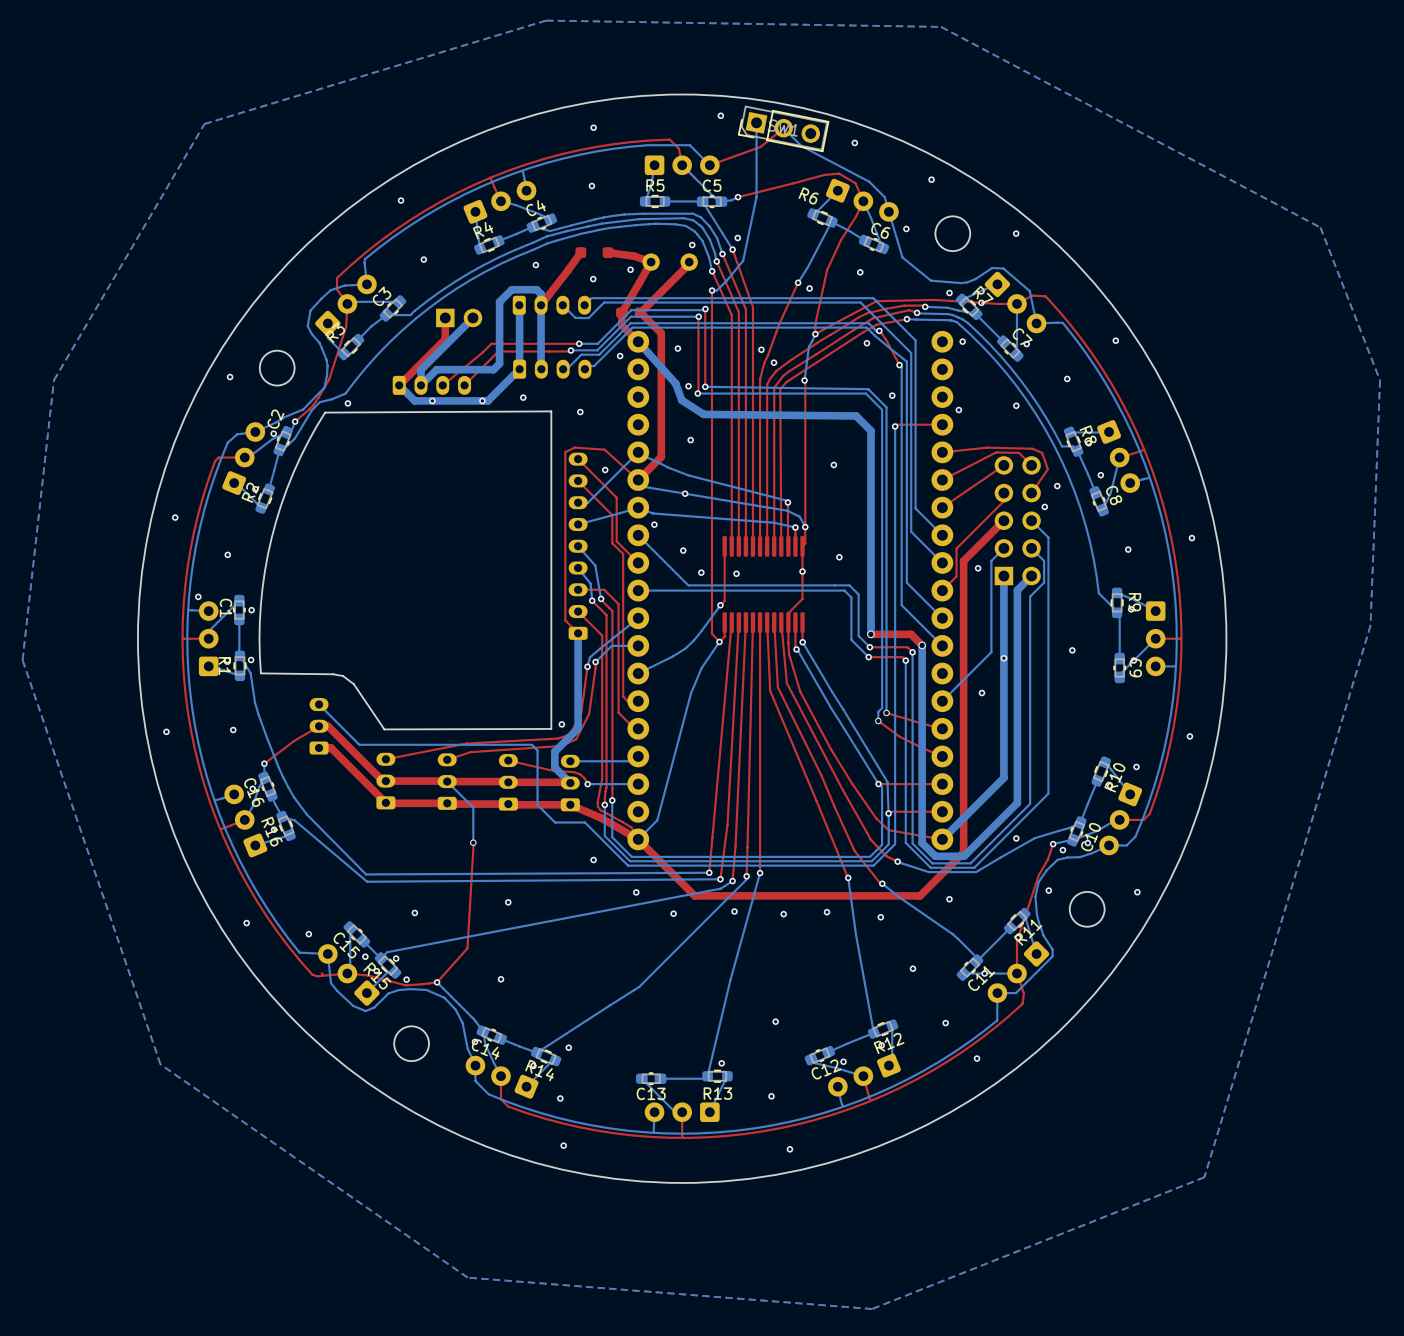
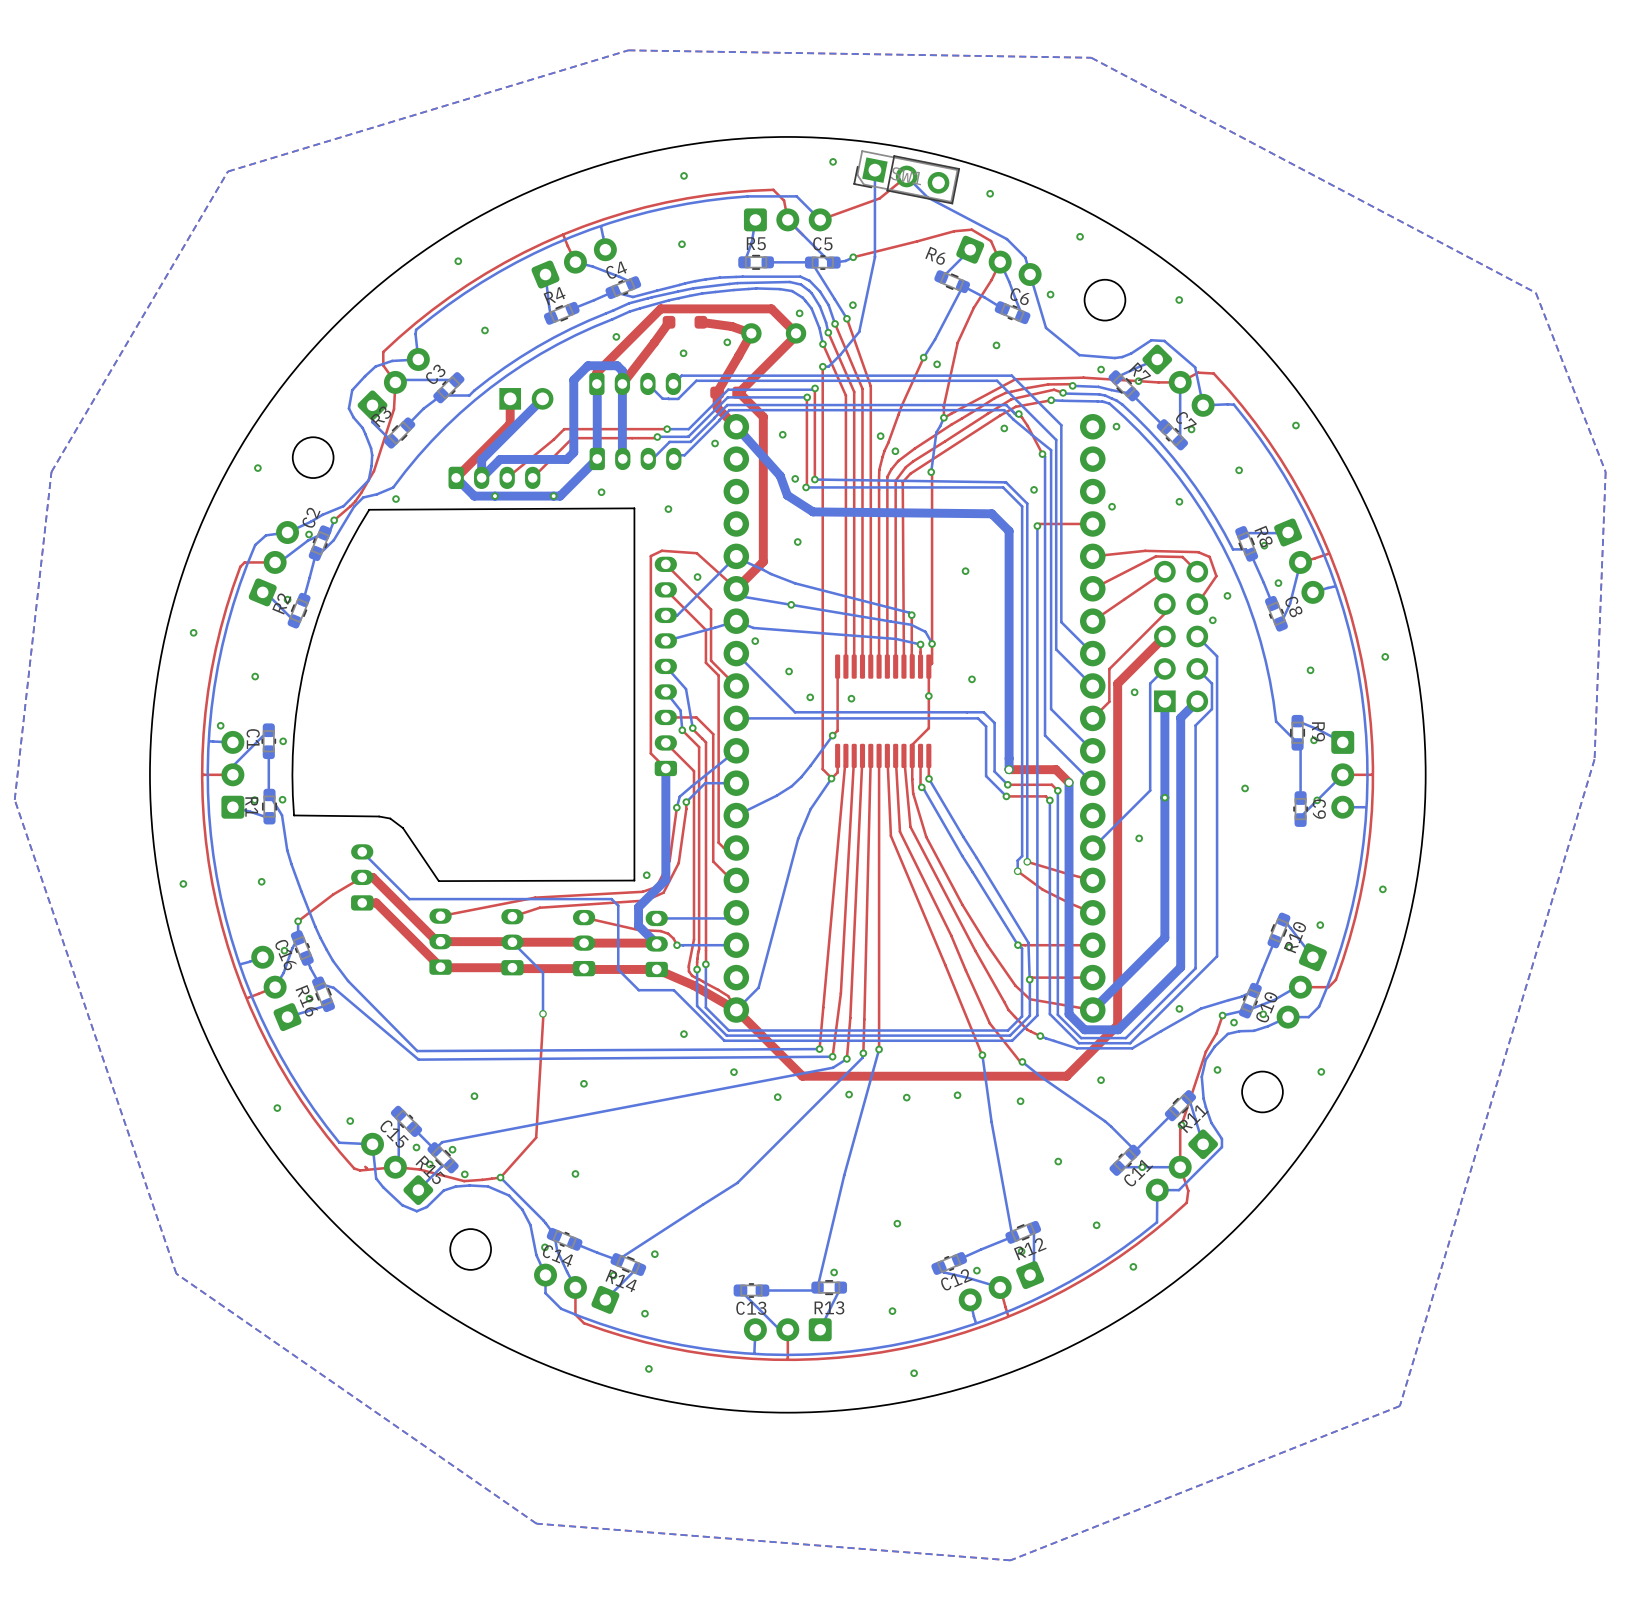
top track: none -> (796, 333) (771, 308) (660, 308) (596, 372) (596, 383)

